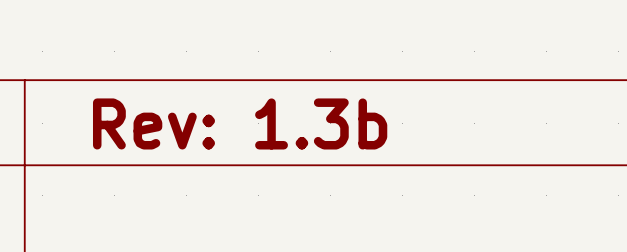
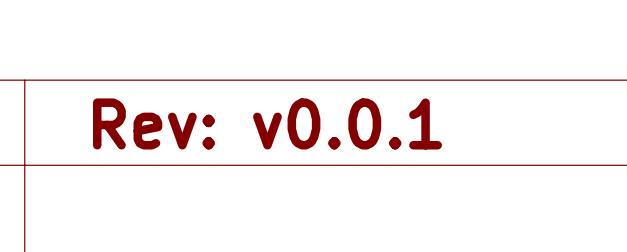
title block: Rev: 1.3b (240, 123) -> Rev: v0.0.1 (267, 123)

